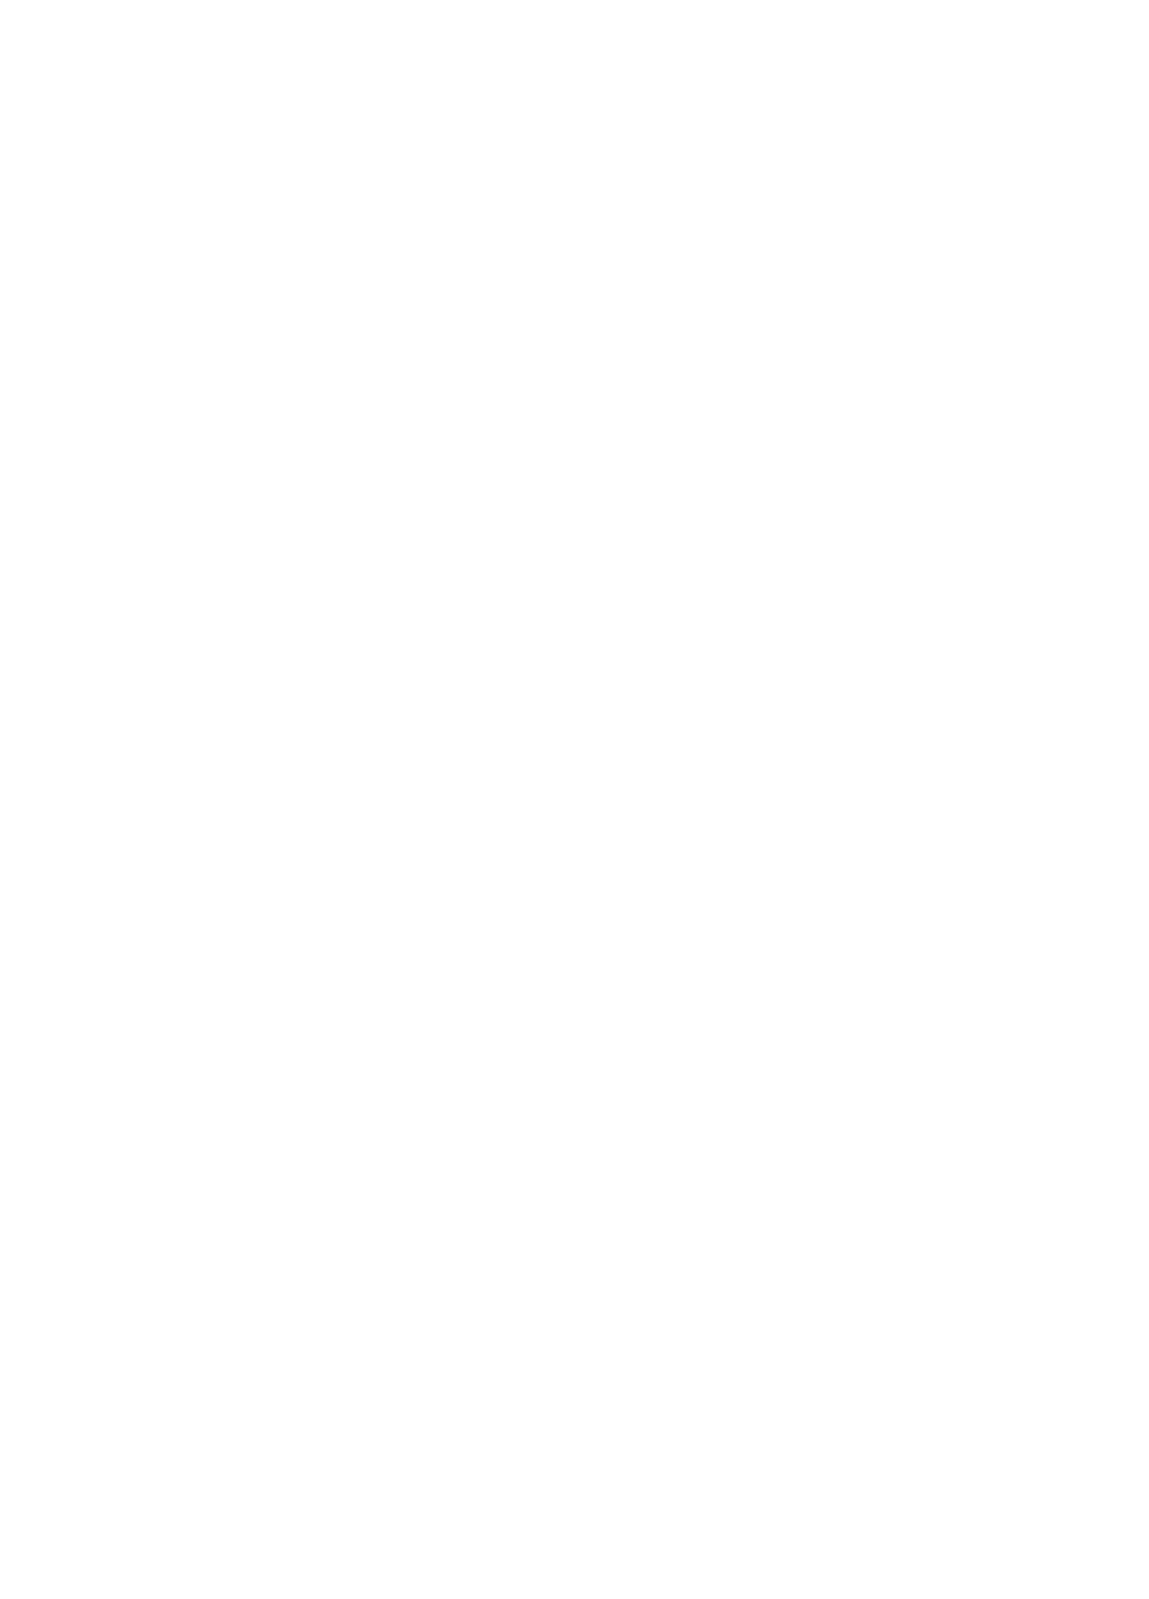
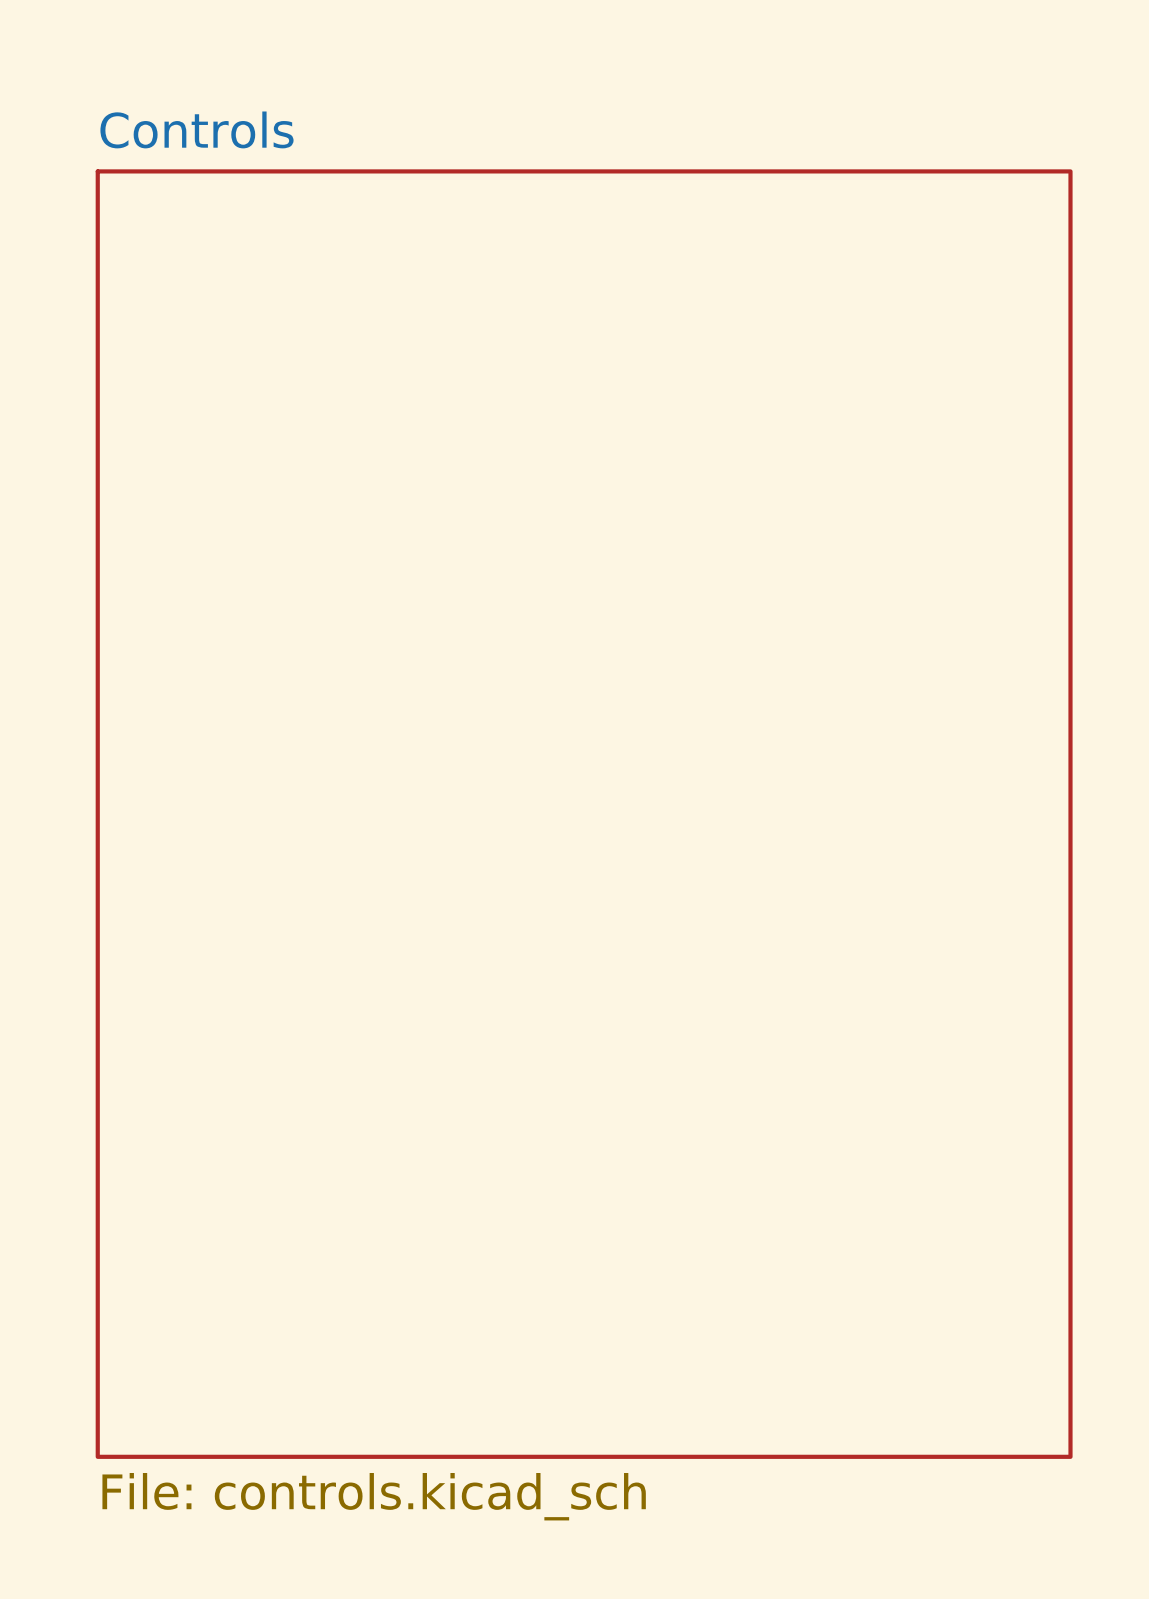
sheet Controls: none -> File: controls.kicad_sch (584, 814)

